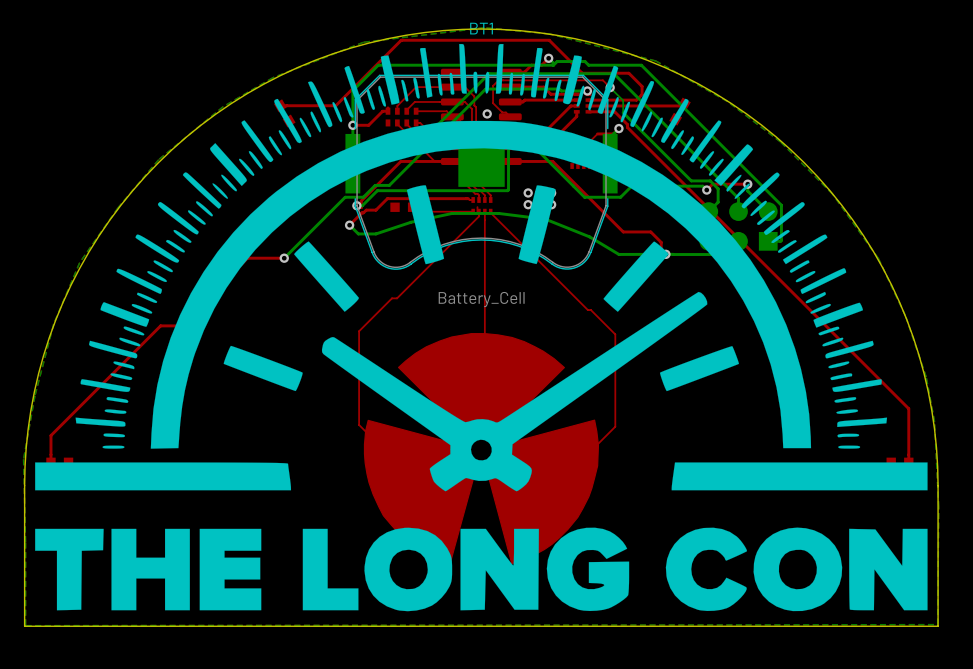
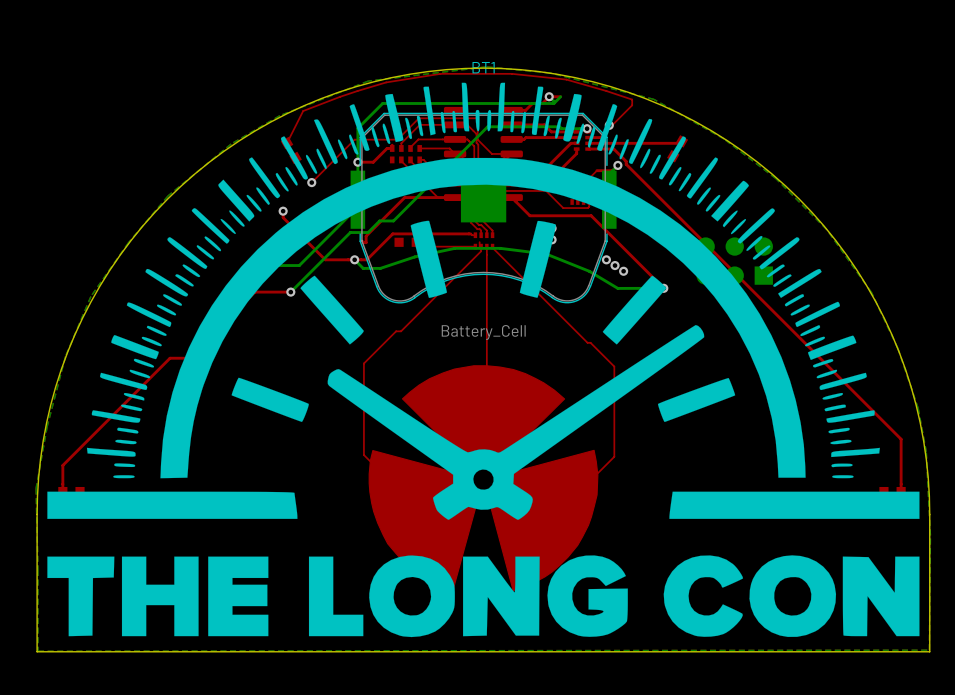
top track: none -> (560, 96) (549, 96)
bottom track: (557, 61) (584, 61) (588, 65) (641, 65) (781, 205) (781, 240) (768, 241) -> (557, 99) (560, 96)
top track: (610, 87) (602, 80) (498, 80) (493, 85) (493, 103) (502, 112) (505, 112) (510, 116) -> (589, 202) (587, 208) (563, 208) (546, 190) (494, 191) (494, 167) (511, 153)
bottom track: (610, 87) (623, 100) (623, 112) (691, 180) (710, 180) (718, 188) (718, 202) (708, 211) (703, 205) (666, 205) -> none
top track: (600, 100) (636, 100) (642, 94) (642, 86) (628, 73) (582, 73) (549, 40) (401, 40) (335, 105) (280, 105) -> (599, 137) (632, 105) (632, 99) (566, 79) (512, 73) (440, 73) (386, 82) (303, 111) (287, 143)
via: (487, 113) -> none
top track: none -> (506, 153) (492, 153) (477, 139) (476, 118) (418, 118) (397, 139) (354, 139) (311, 182)
bottom track: (423, 139) (489, 73) (613, 73) (738, 198) (738, 211) -> none
via: none -> (311, 182)
top track: (510, 161) (552, 161) (623, 231) (650, 231) (661, 242) (661, 249) -> (511, 197) (529, 215) (591, 215) (659, 283)
bottom track: none -> (357, 199) (357, 207) (299, 265) (273, 265) (268, 260) (268, 248)
via: none -> (283, 211)
top track: (747, 184) (712, 184) (706, 190) -> none
bottom track: (747, 184) (747, 191) (768, 211) -> none
via: (747, 184) -> none
bottom track: (706, 190) (702, 186) (631, 186) (620, 197) (584, 197) (524, 137) (508, 137) (507, 190) (377, 190) (362, 205) (356, 205) -> none
via: (706, 190) -> none
via: (528, 192) -> none
top track: (388, 198) (375, 210) (366, 210) (361, 212) (349, 225) -> (392, 233) (366, 259) (325, 259) (283, 217) (283, 211)
via: (528, 204) -> none
via: (356, 205) -> none
via: none -> (606, 259)
via: none -> (615, 265)
via: none -> (623, 271)
bottom track: (738, 241) (725, 254) (665, 254) -> none

